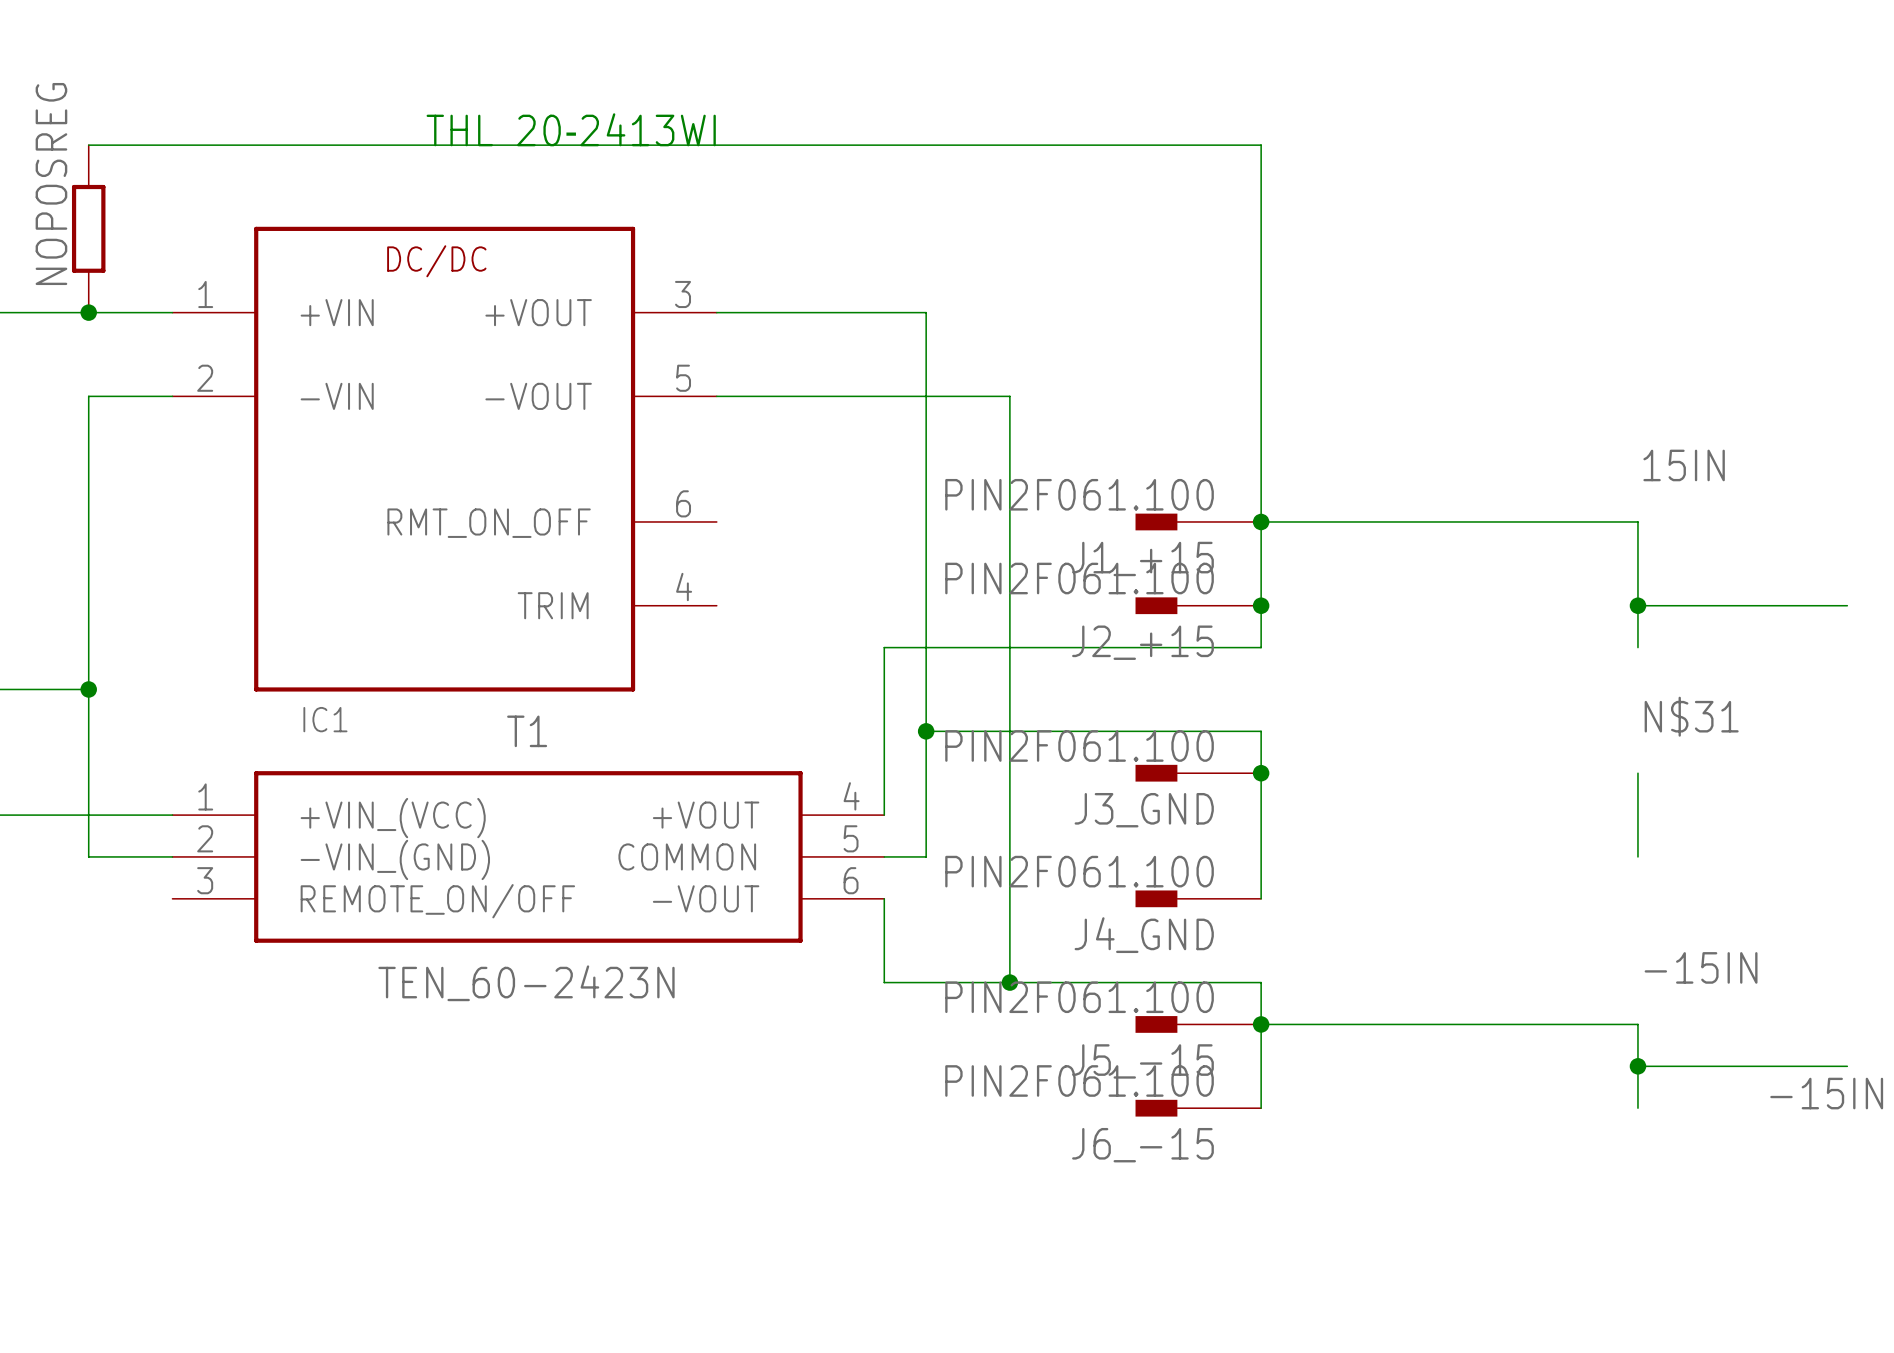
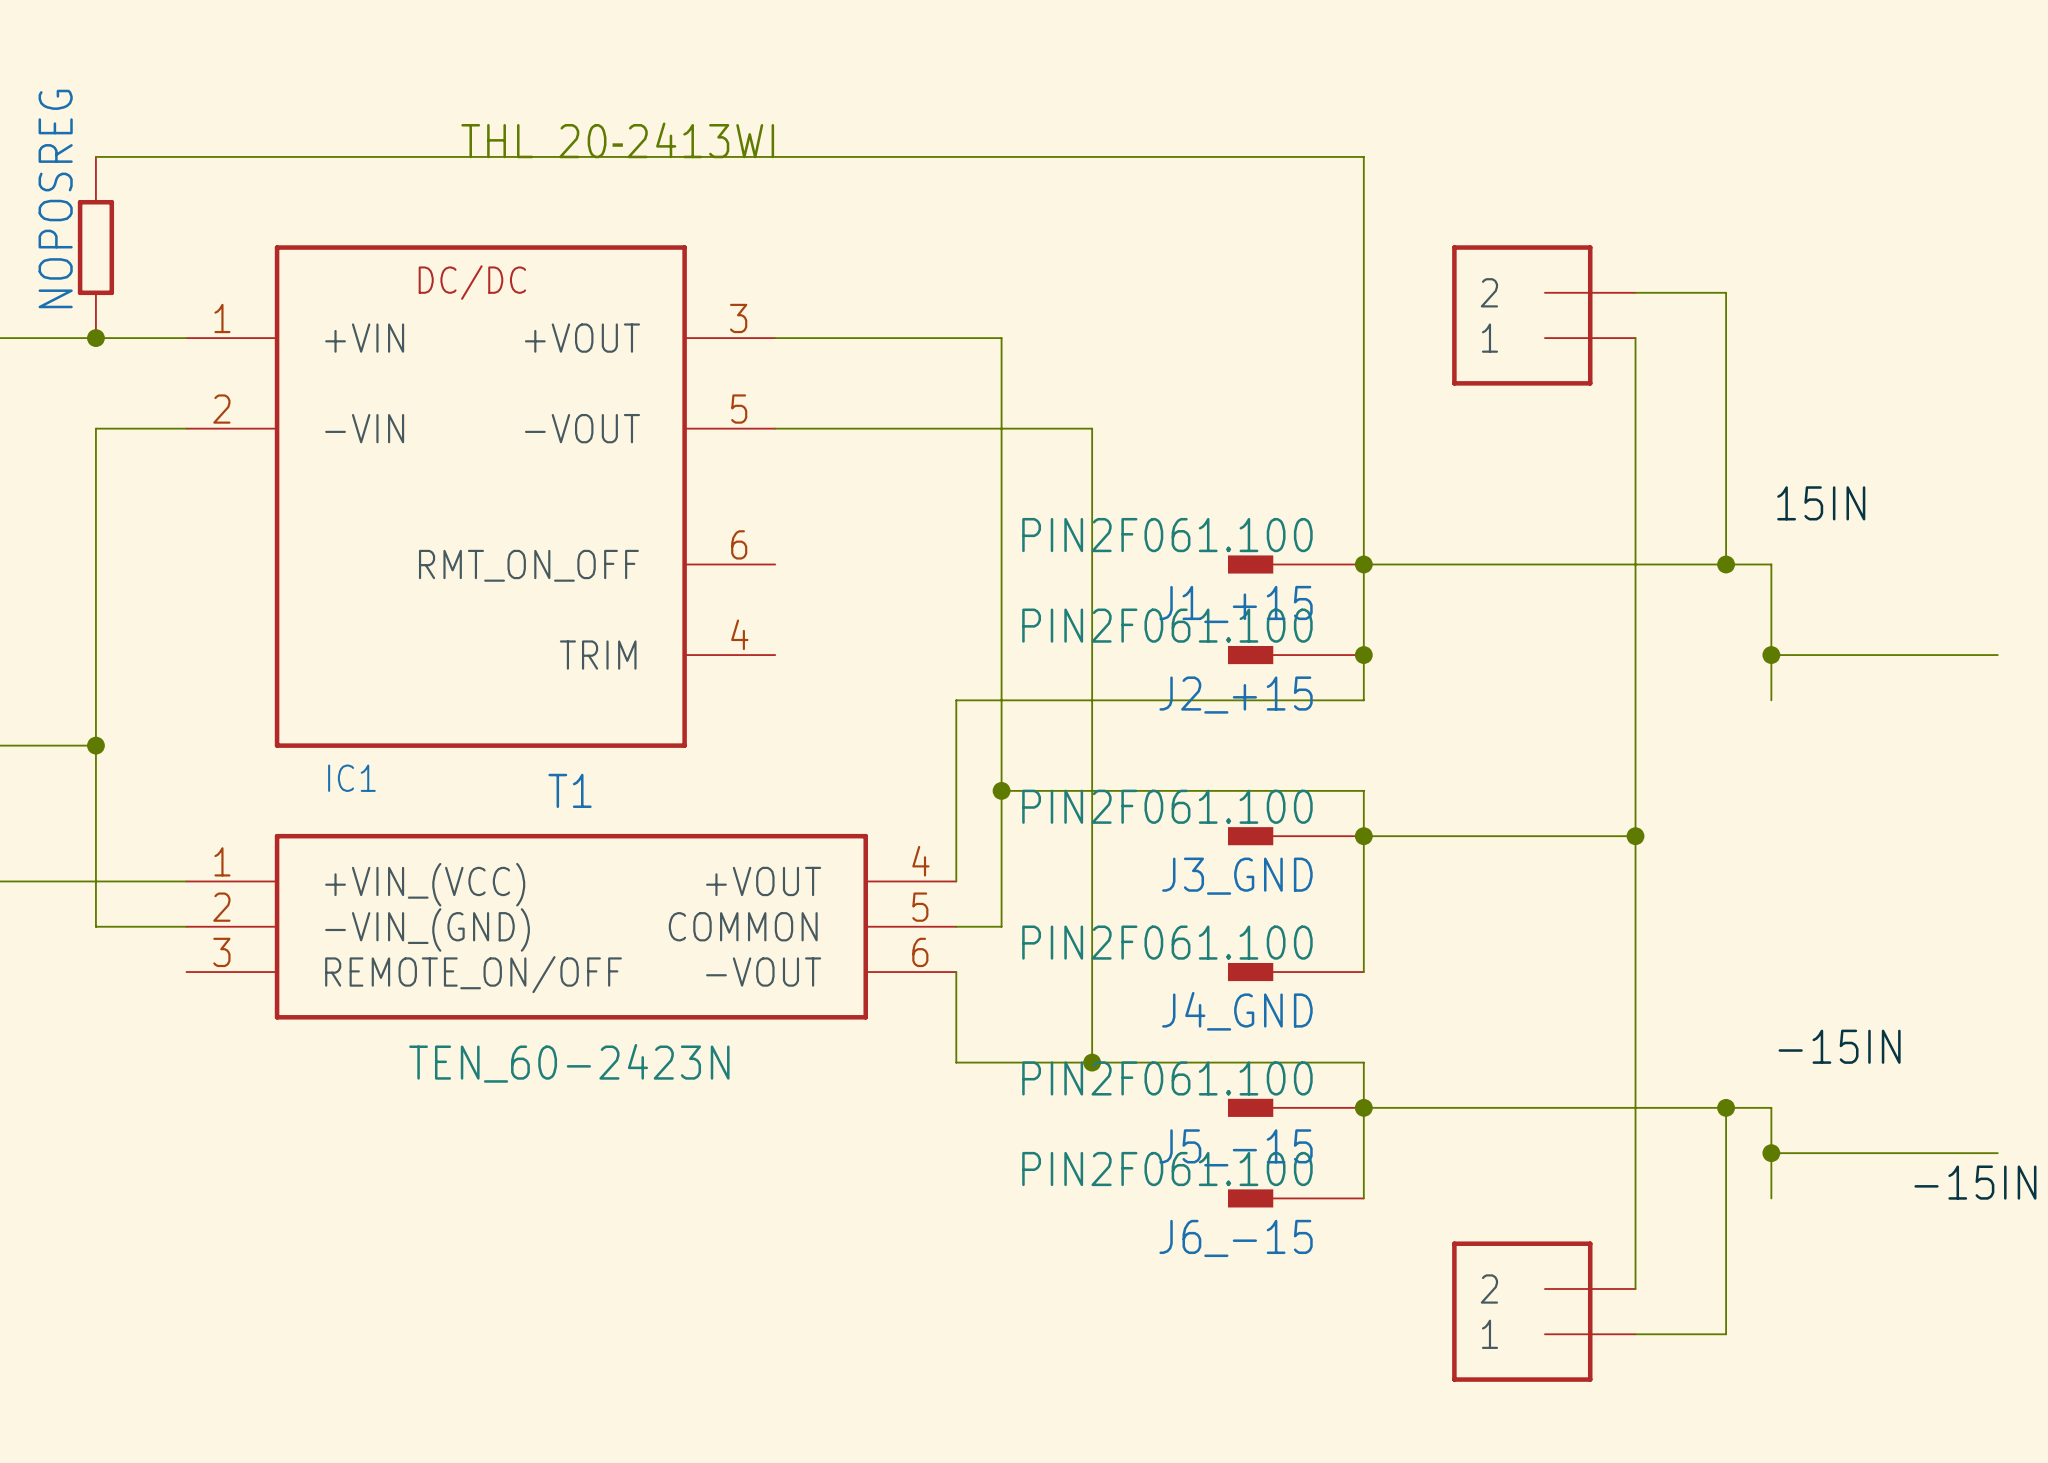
wire: none -> (1635, 292) (1726, 292) (1726, 564)
part: none -> (1543, 315)
wire: none -> (1635, 338) (1635, 1288)
junction: none -> (1726, 564)
label: N$31 (1691, 716) -> none
wire: none -> (1363, 836) (1635, 836)
junction: none -> (1635, 836)
wire: (1637, 773) (1637, 856) -> none
wire: none -> (1726, 1107) (1726, 1334) (1635, 1334)
junction: none -> (1726, 1107)
part: none -> (1543, 1311)

